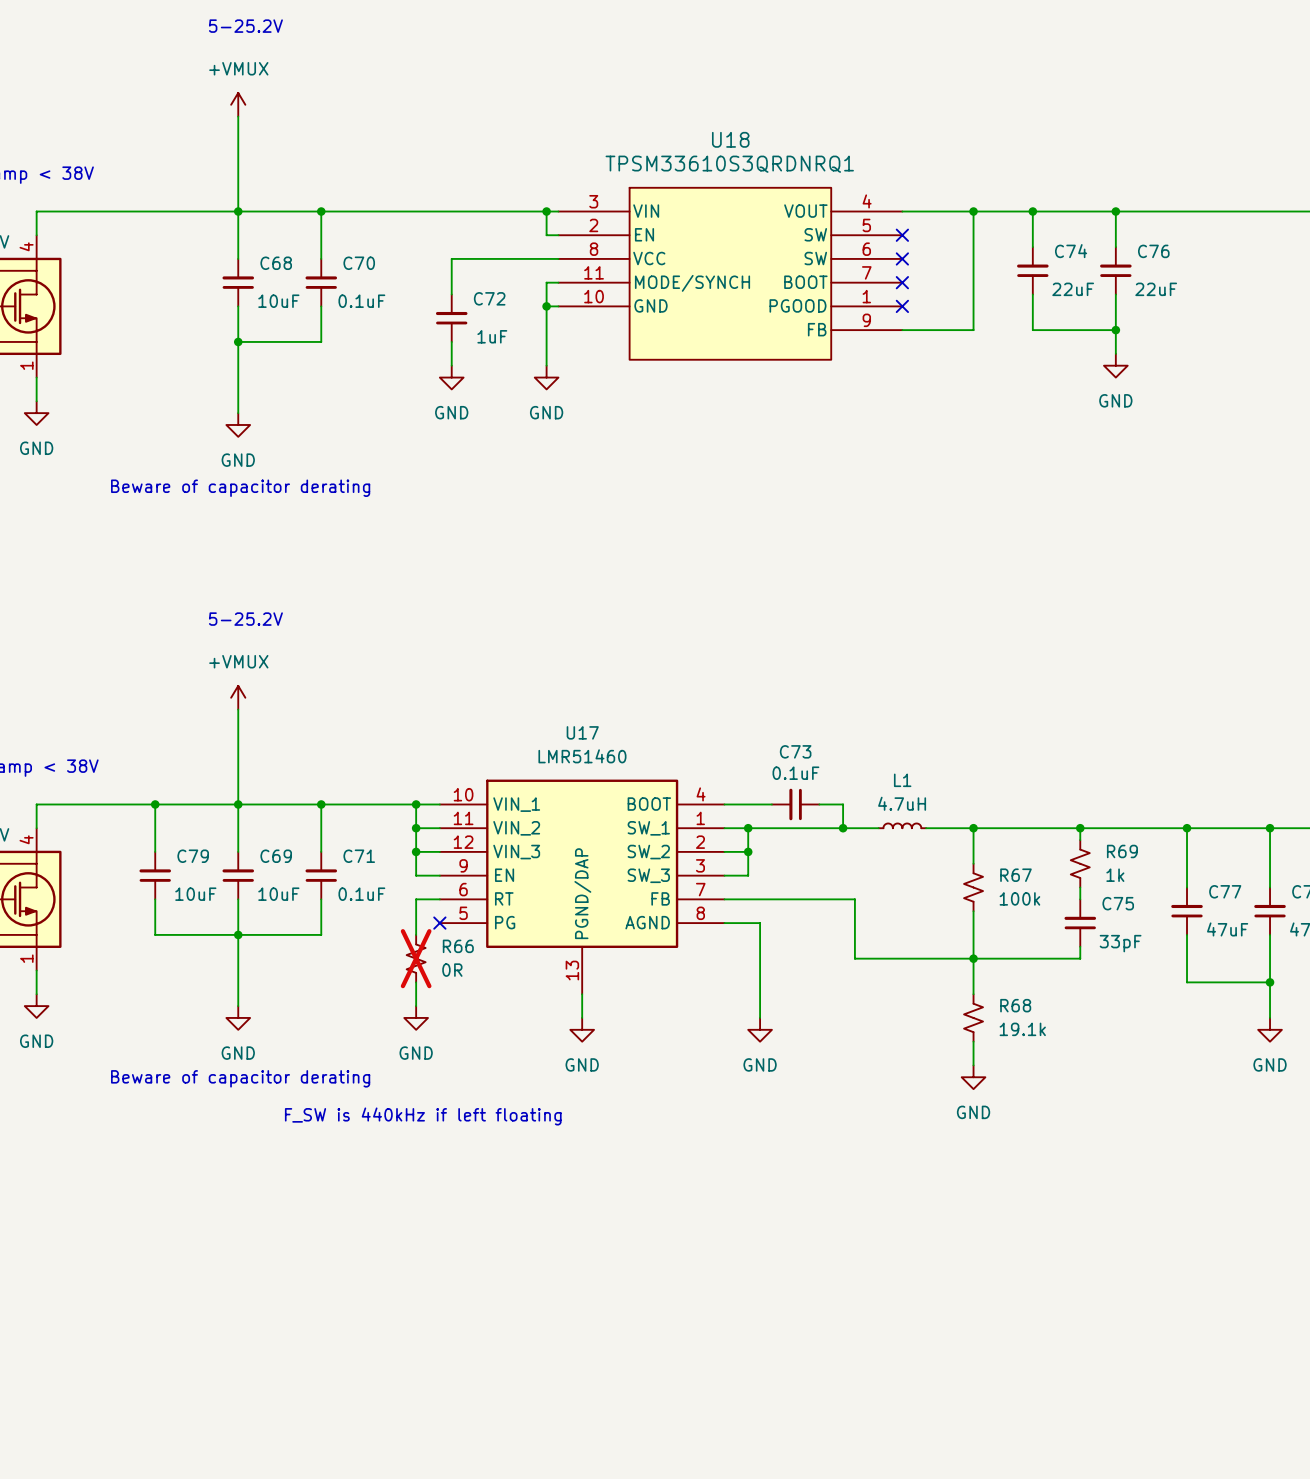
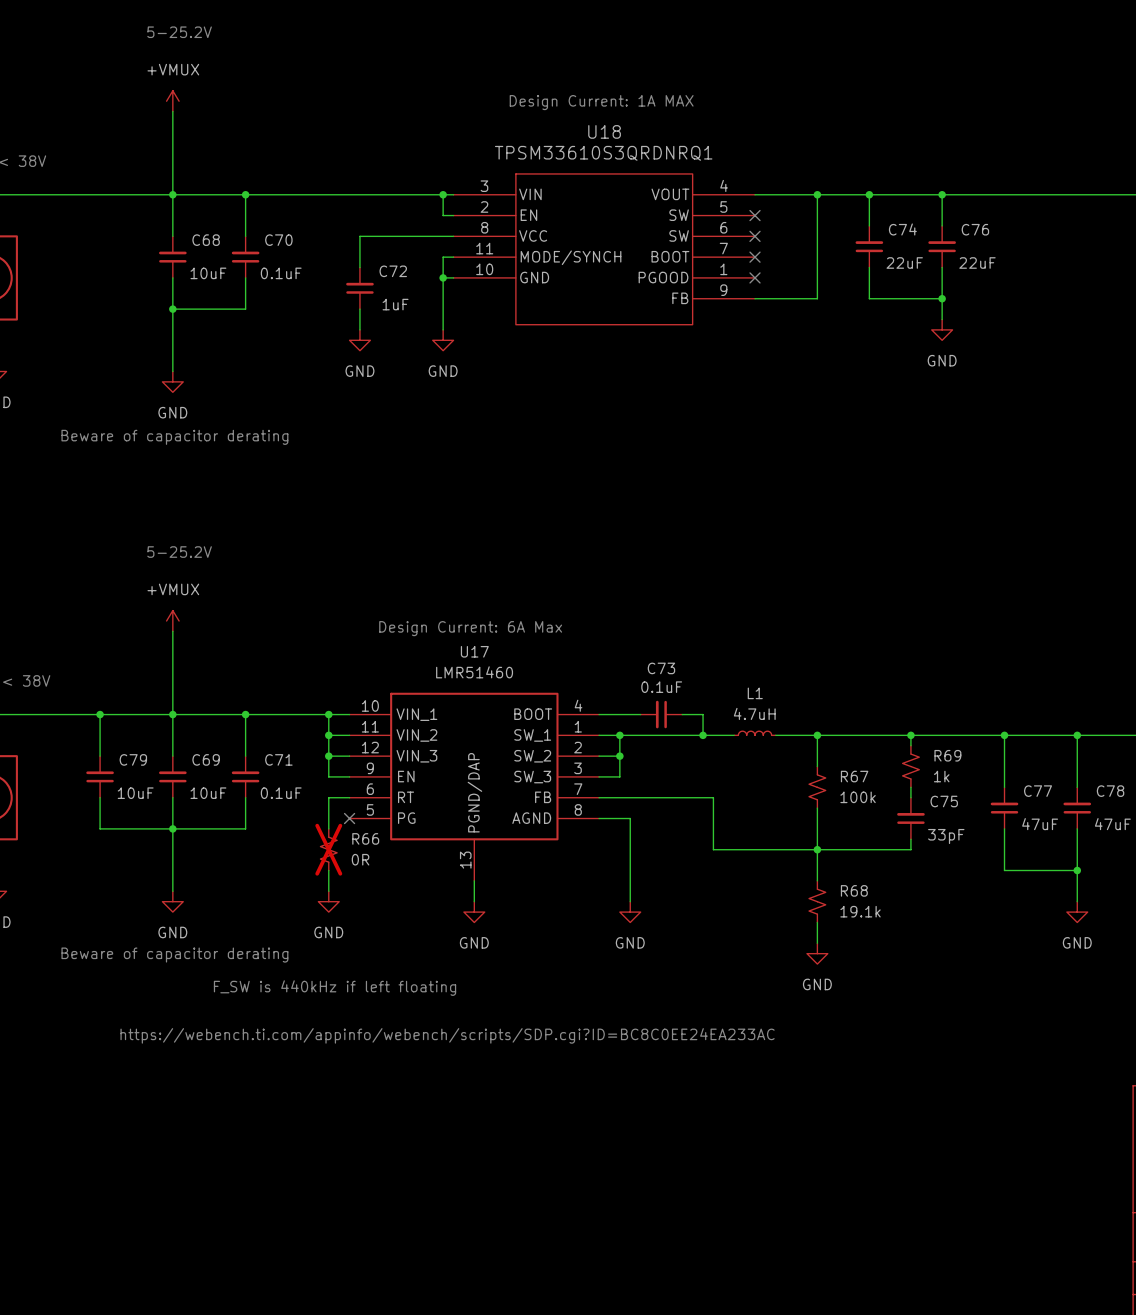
text: none -> Design Current: 1A MAX (601, 102)
text: none -> Design Current: 6A Max (470, 628)
text: none -> https://webench.ti.com/appinfo/webench/scripts/SDP.cgi?ID=BC8C0EE24EA233AC (447, 1035)

